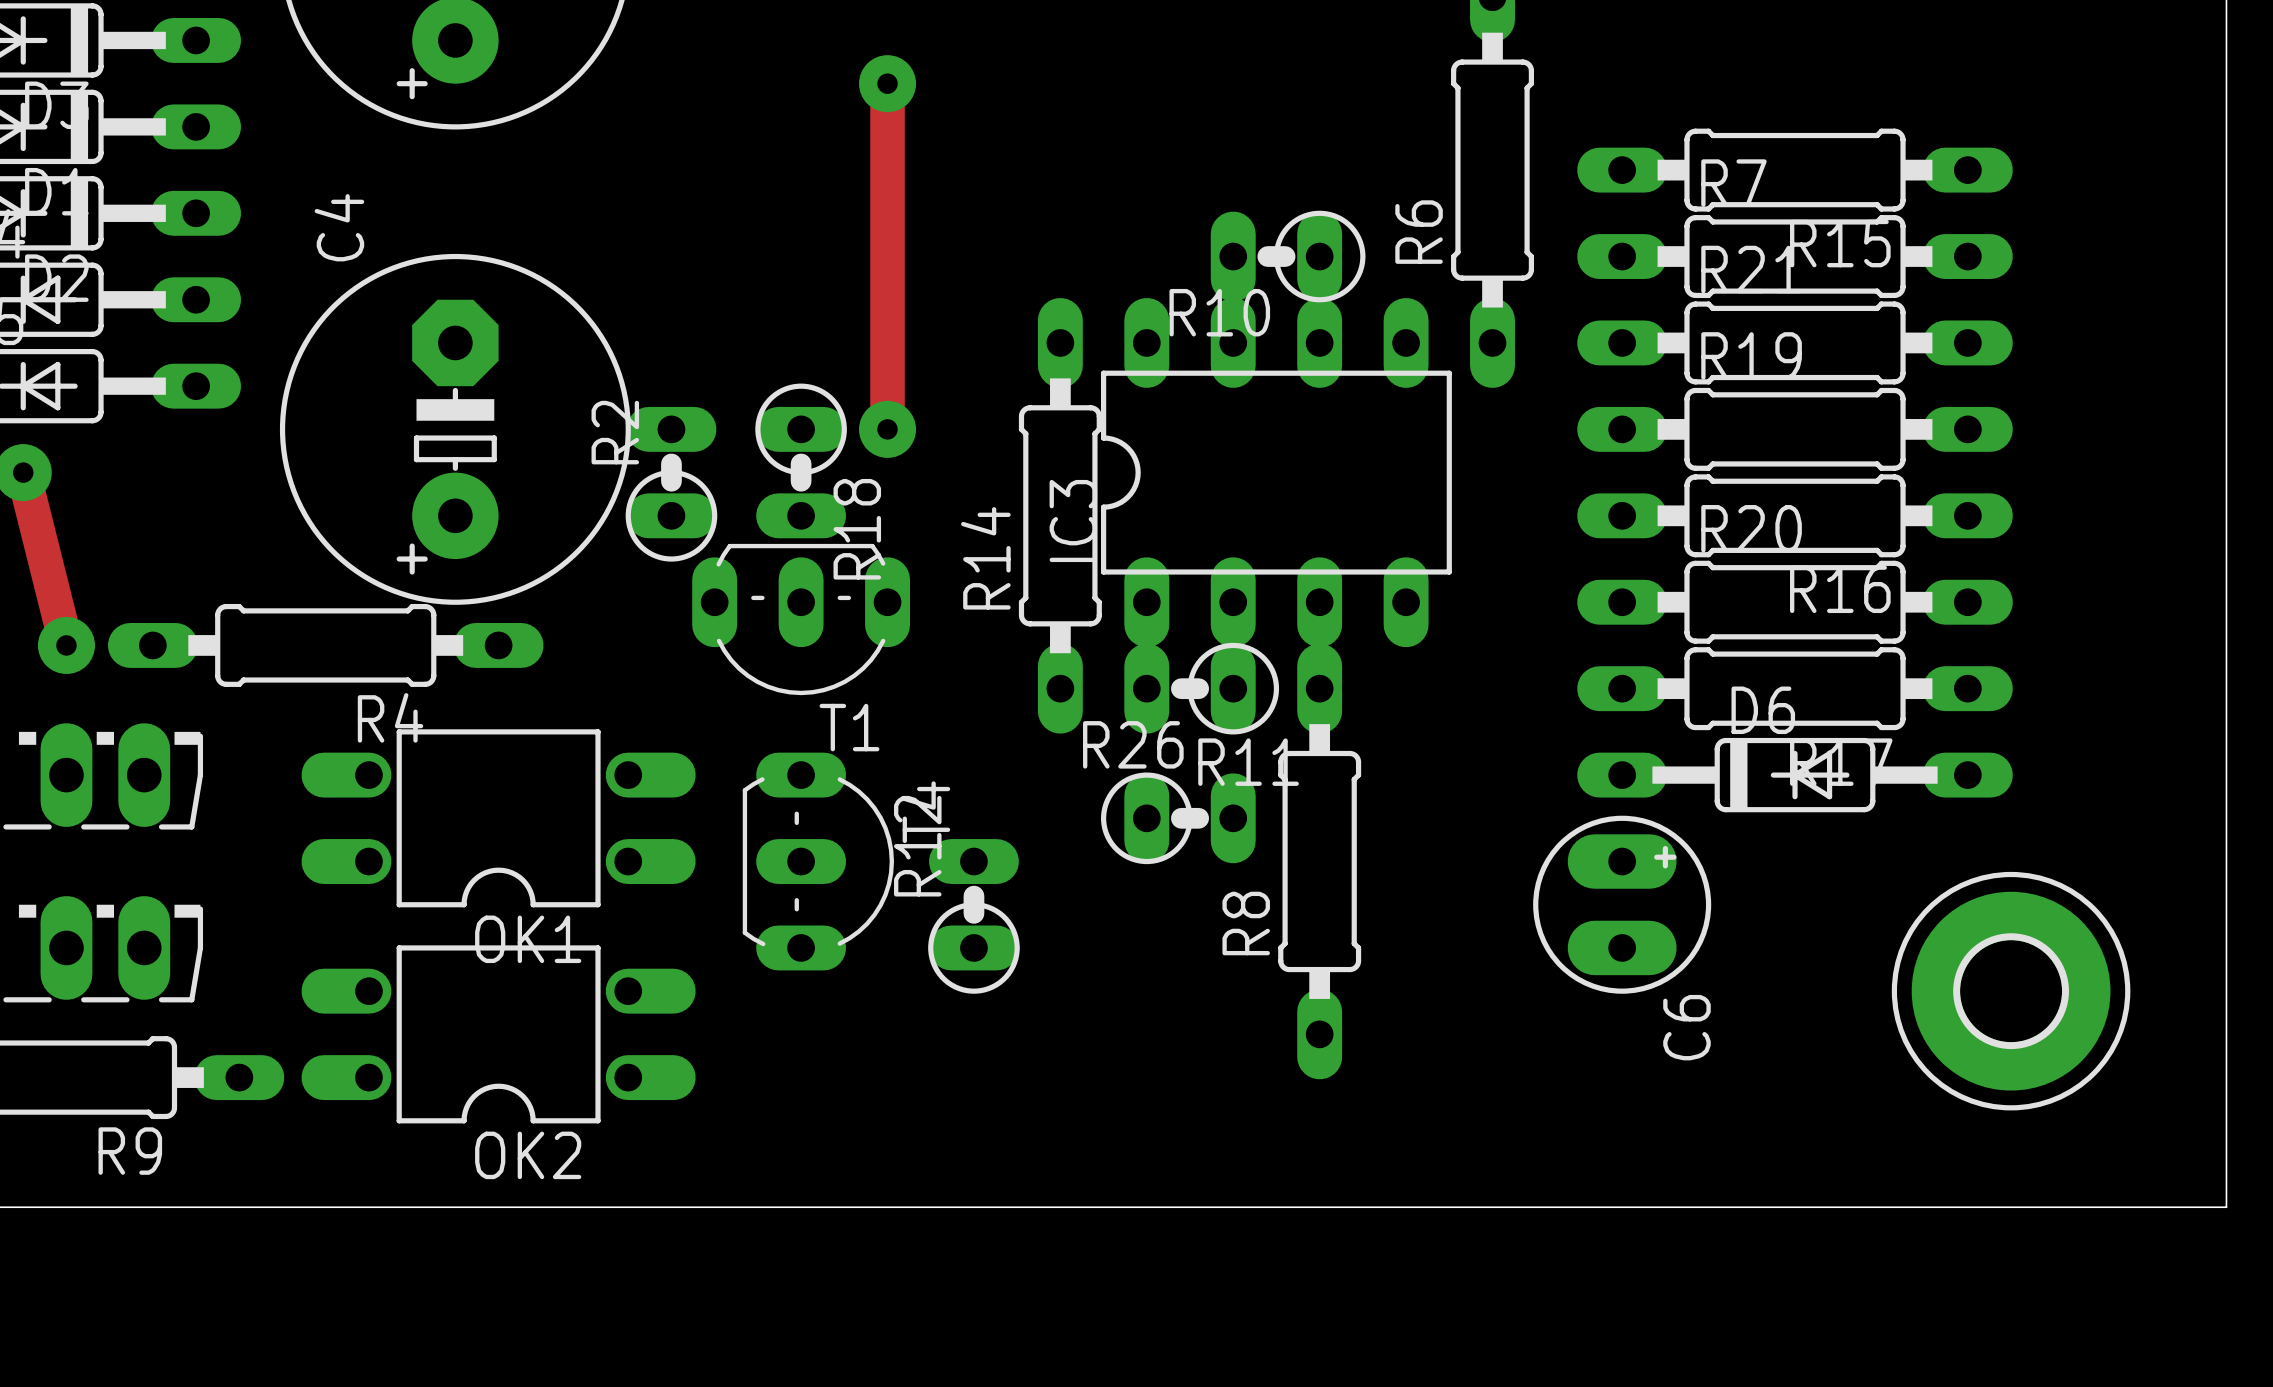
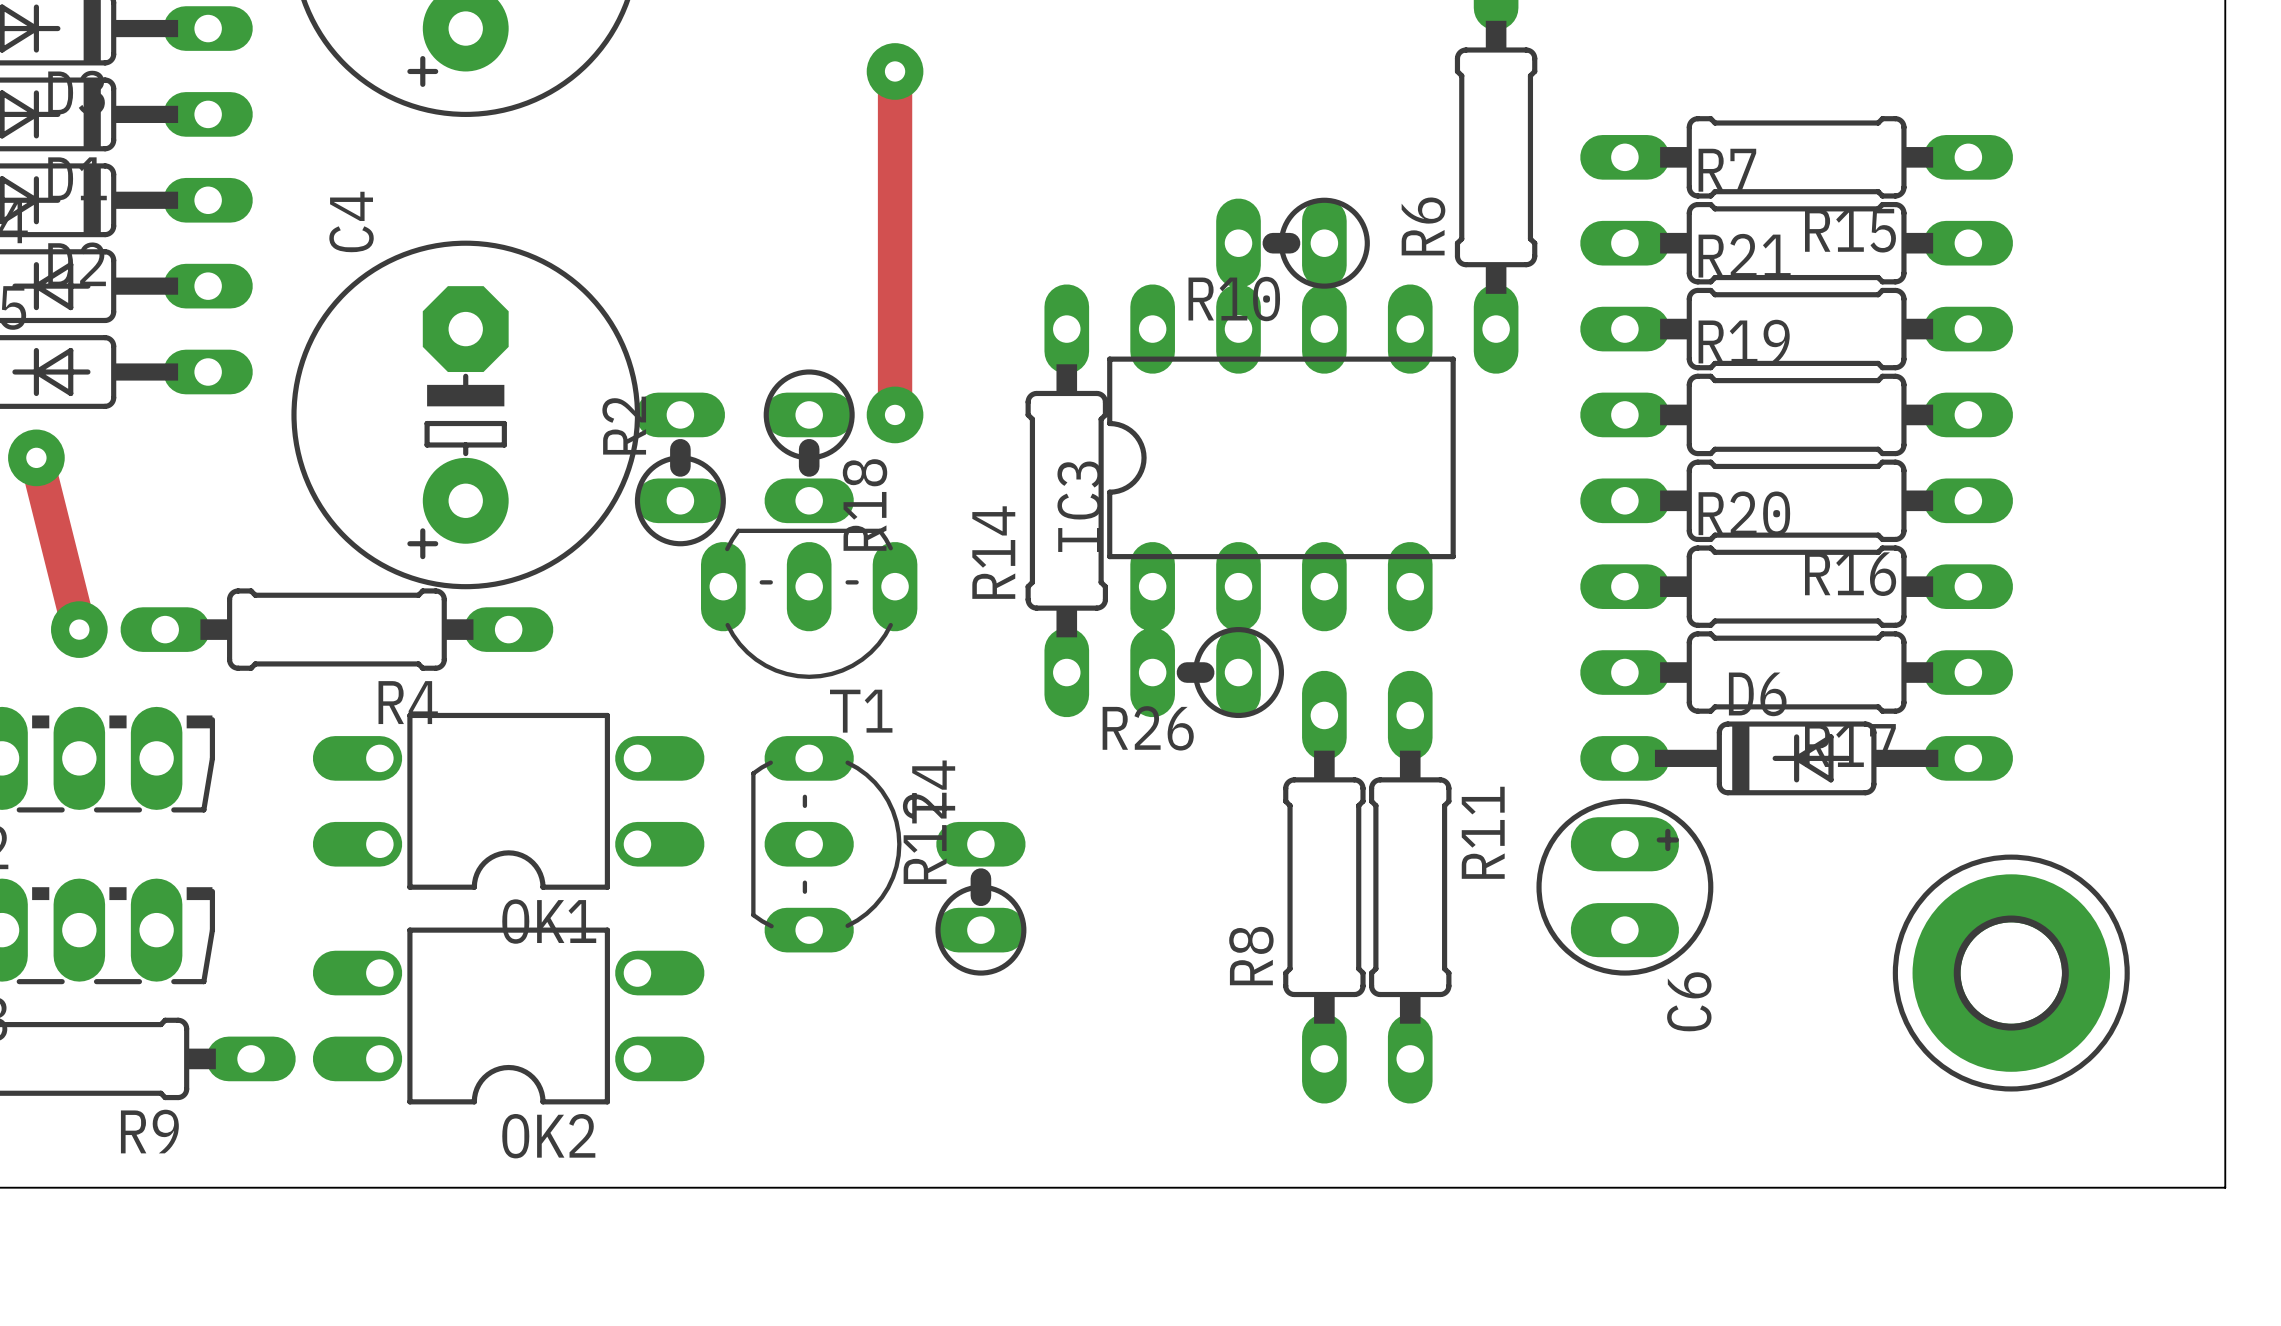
R11 footprint: [1101, 772, 1256, 865] -> [1369, 670, 1452, 1104]
R8 position: (1319, 861) -> (1324, 887)

